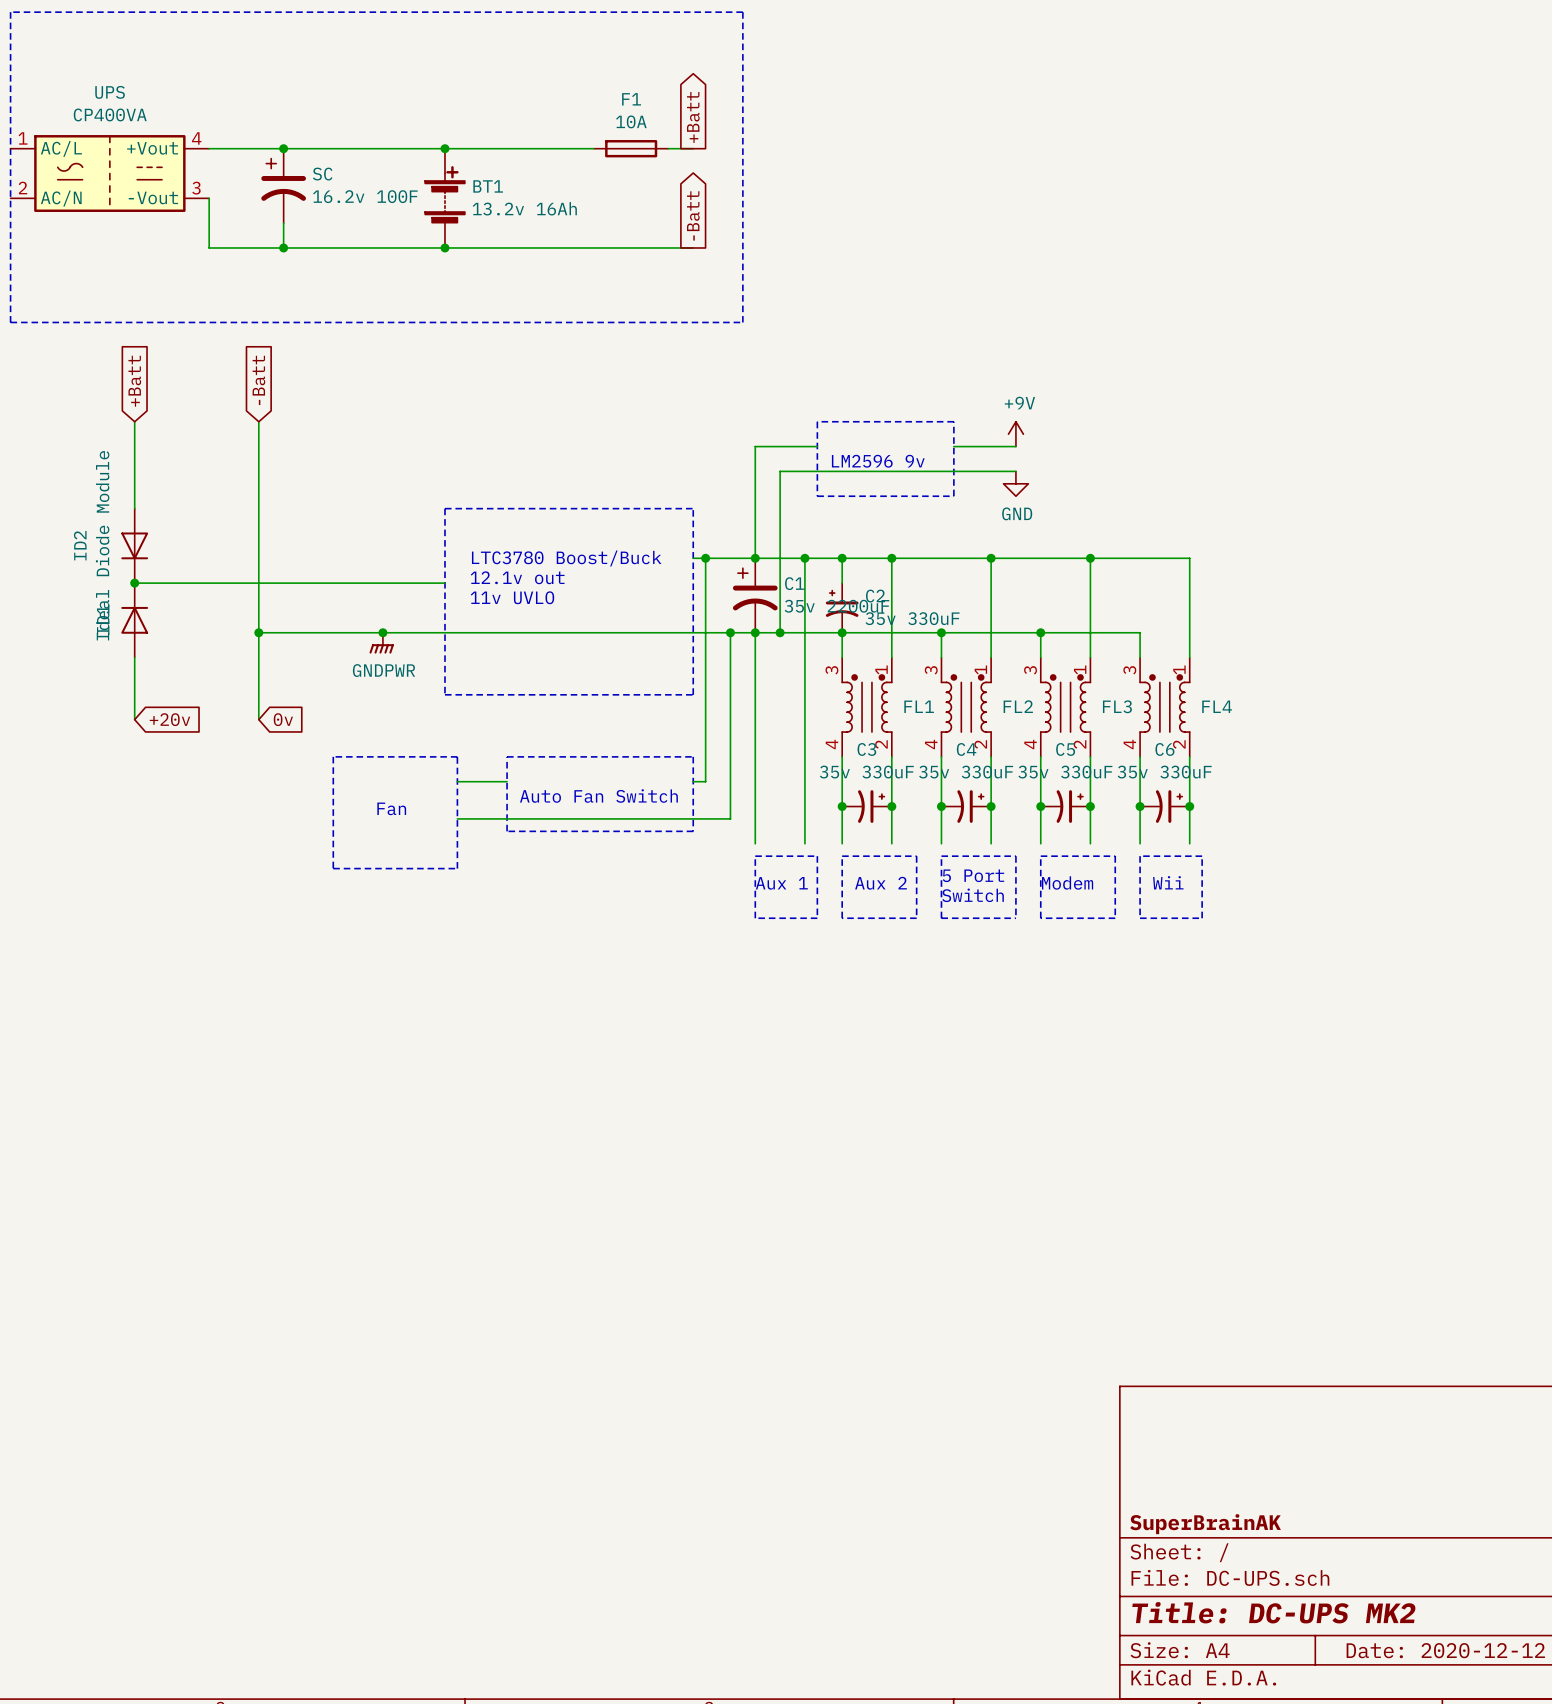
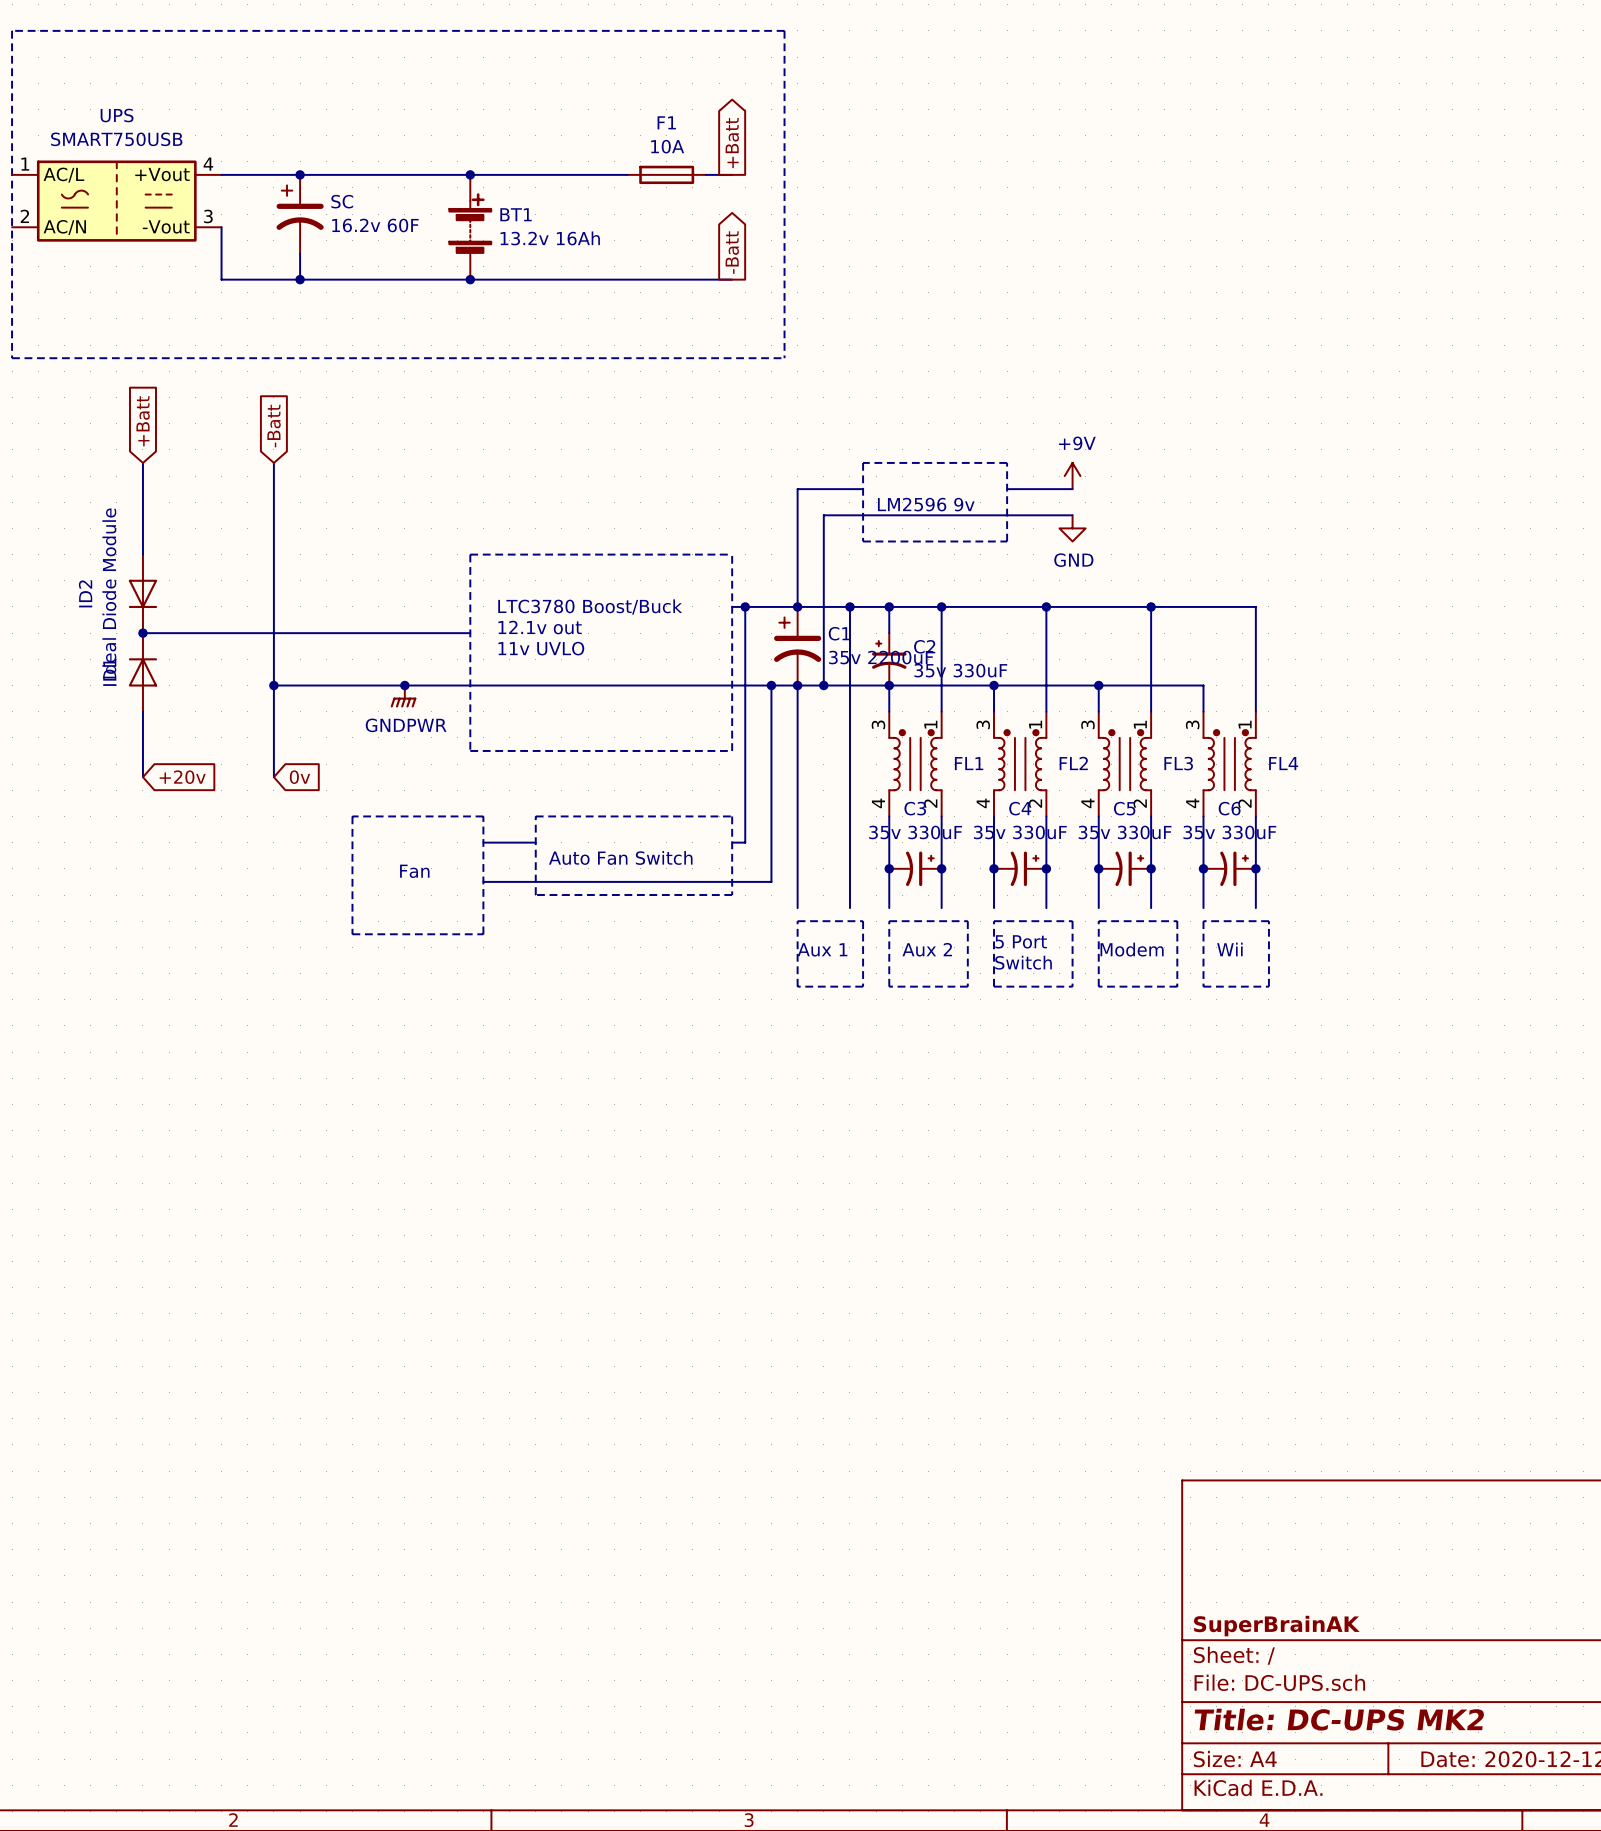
UPS value: CP400VA (110, 114) -> SMART750USB (116, 139)
SC value: 16.2v 100F (365, 196) -> 16.2v 60F (375, 225)

